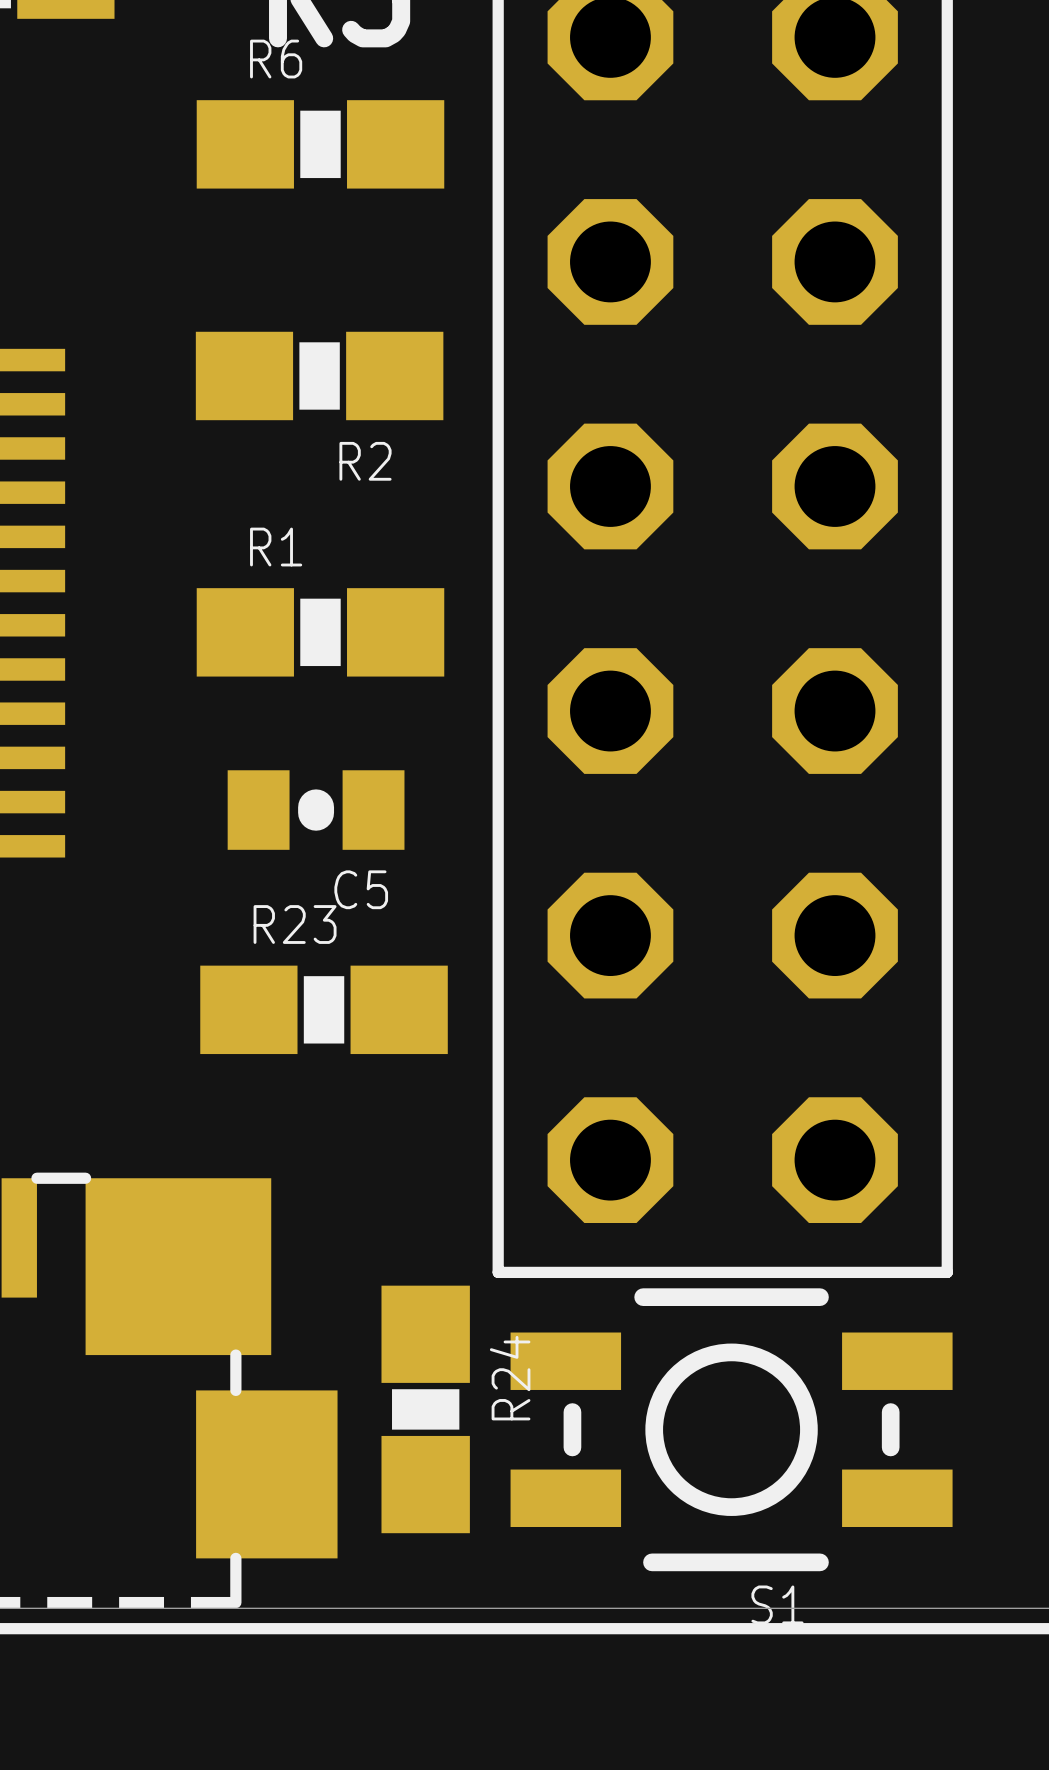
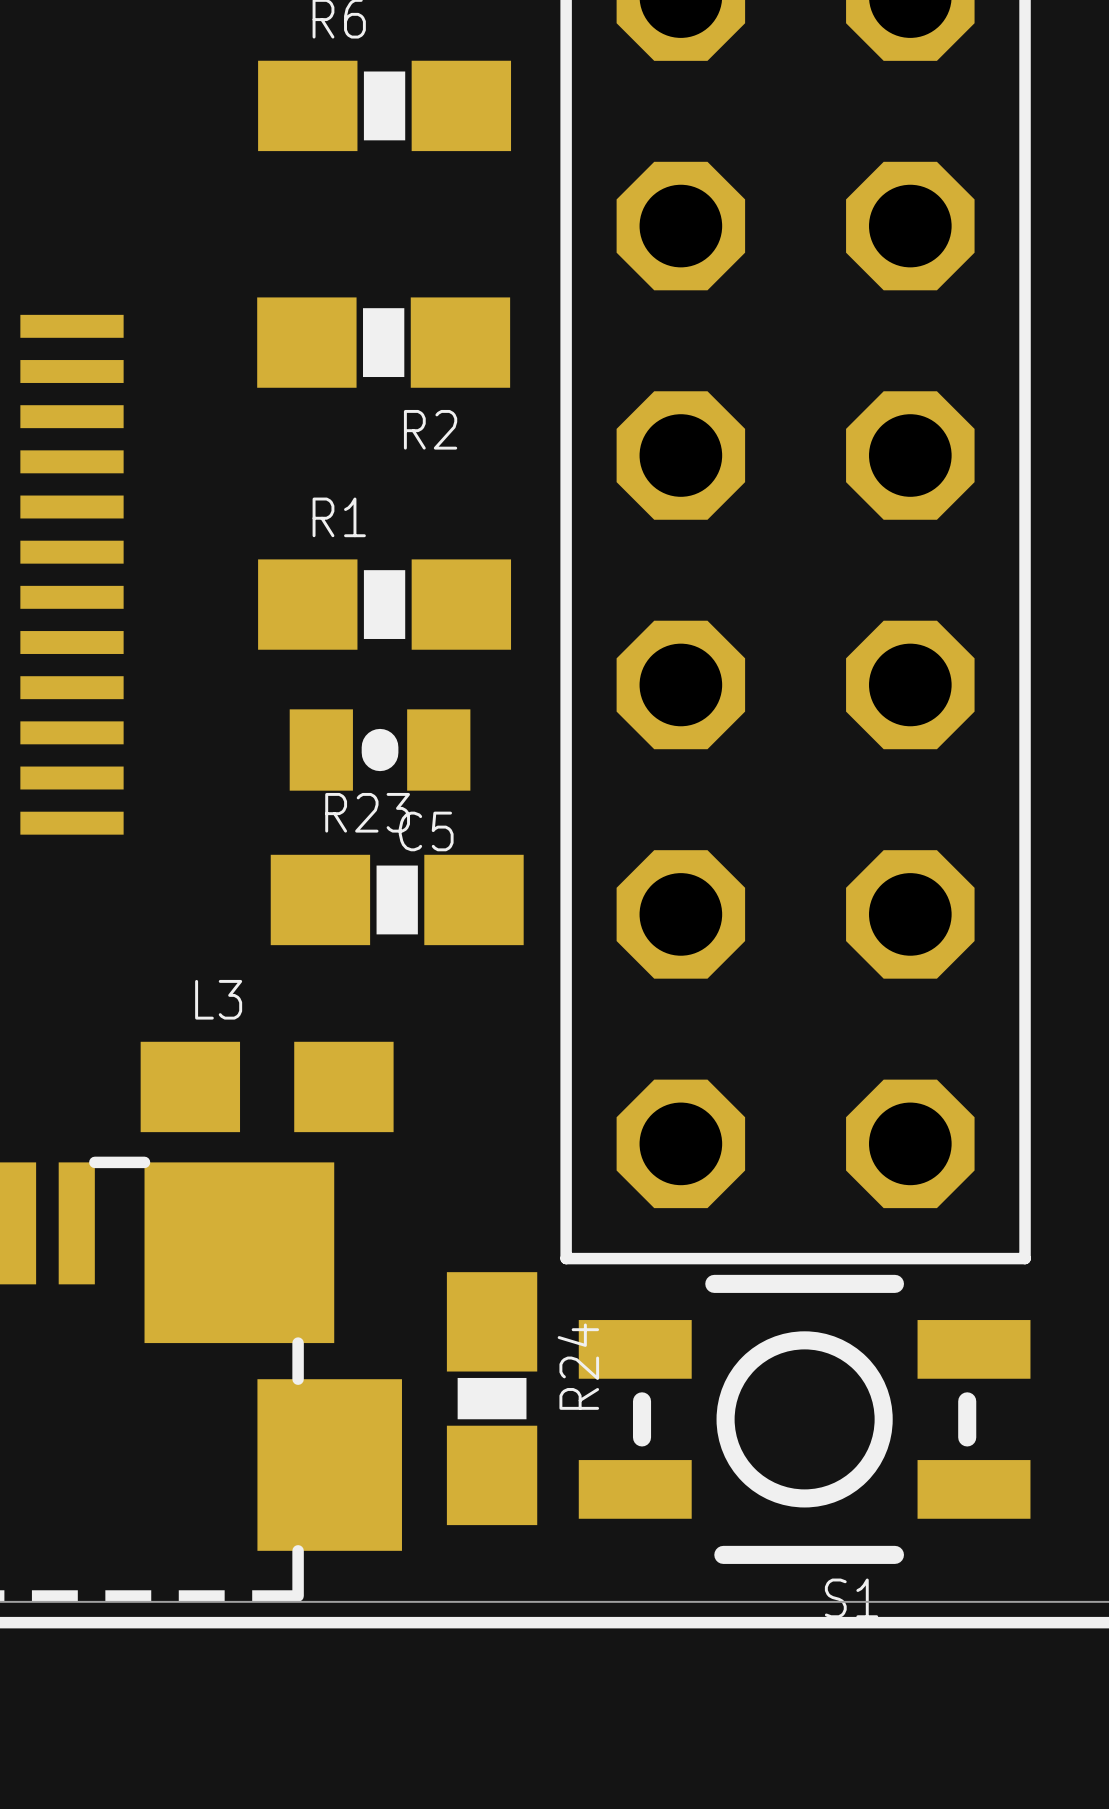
C5 position: (316, 810) -> (380, 750)
R23 position: (324, 1009) -> (397, 899)
L3: none -> (267, 1086)

